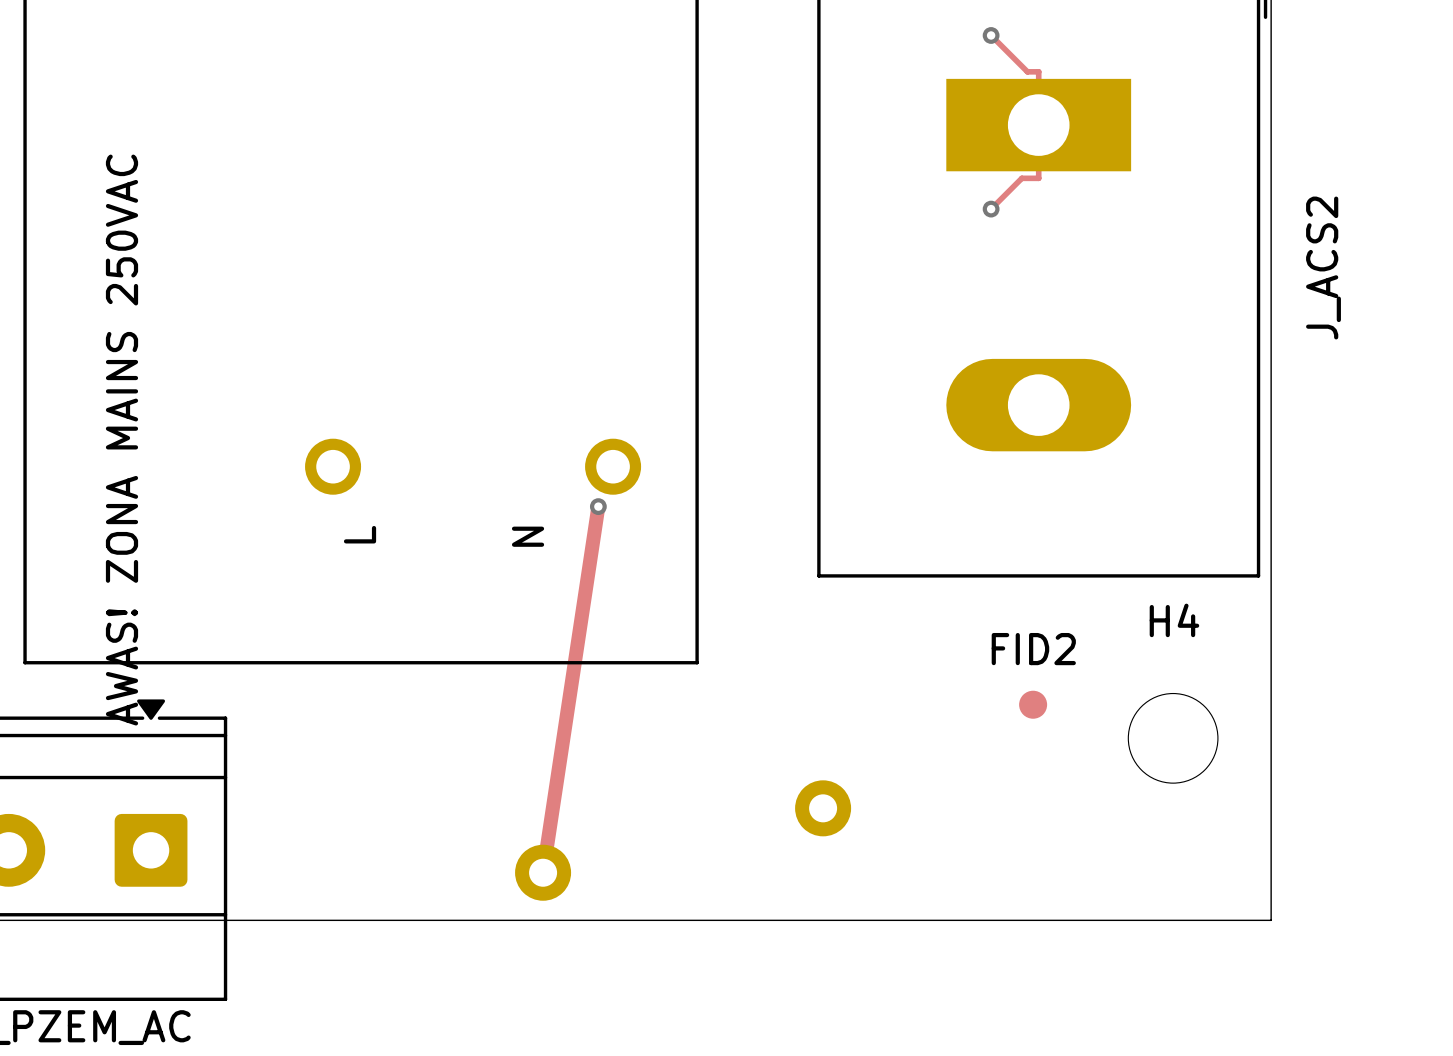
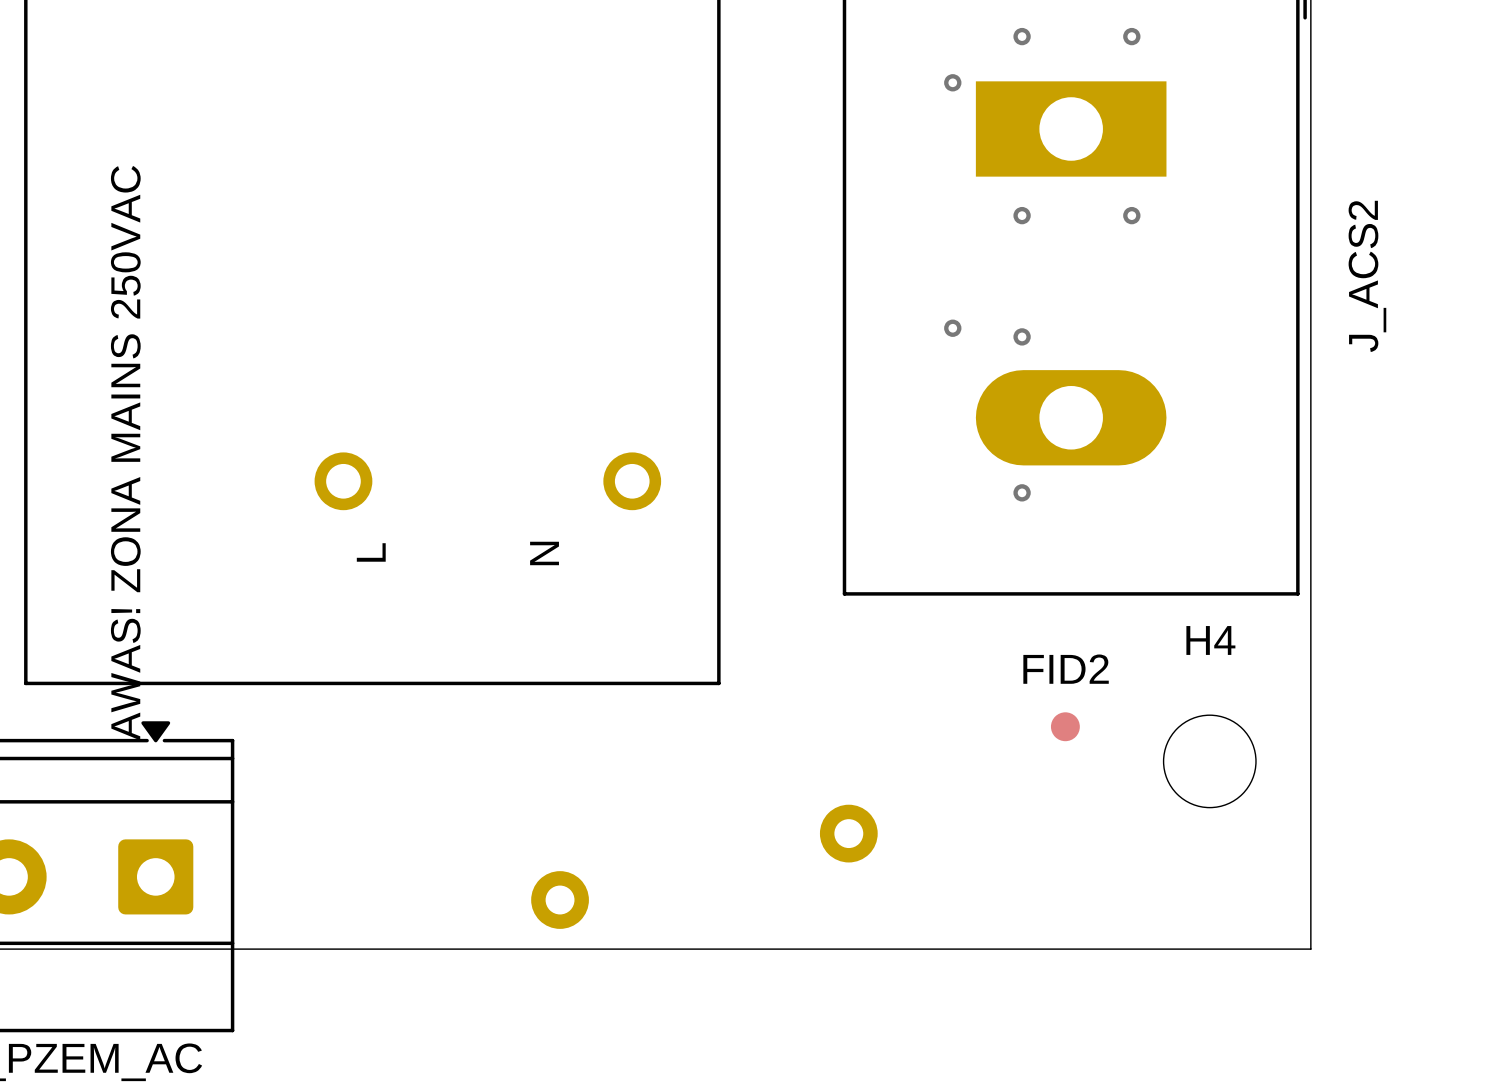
track: (991, 35) (1027, 71) (1038, 71) (1038, 178) (1021, 178) (991, 209) -> none
via: none -> (1131, 36)
via: none -> (952, 82)
via: none -> (1131, 215)
via: none -> (952, 328)
via: none -> (1022, 336)
via: none -> (1022, 492)
track: (598, 506) (543, 872) -> none
via: (598, 506) -> none

